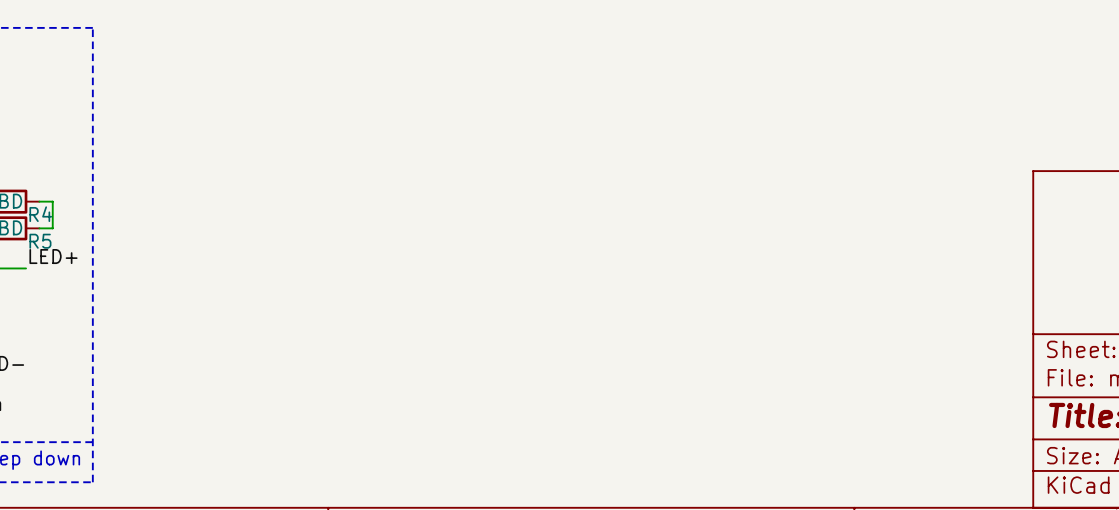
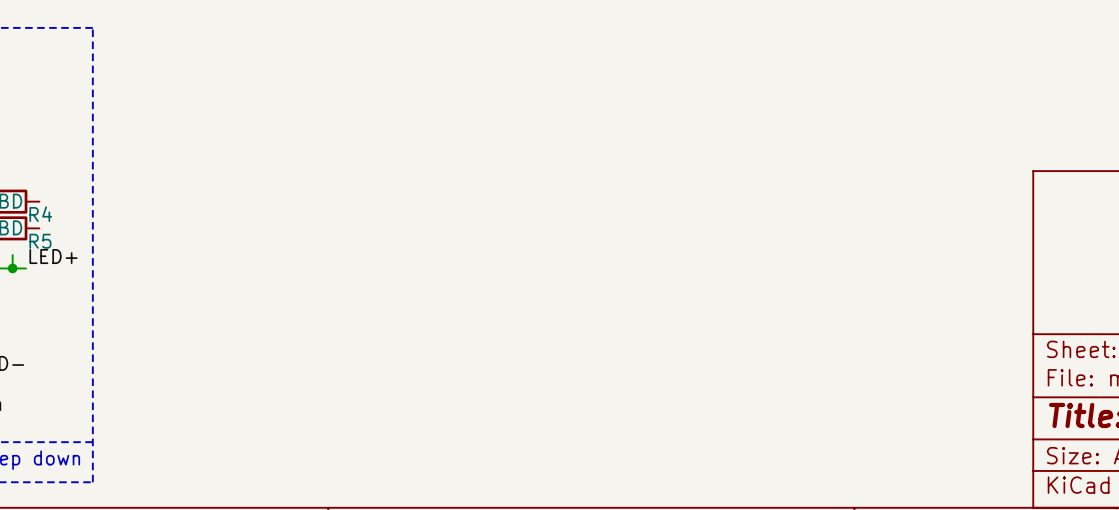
wire: (39, 201) (52, 201) (52, 228) (39, 228) -> none
wire: none -> (12, 255) (12, 268)
junction: none -> (12, 268)

